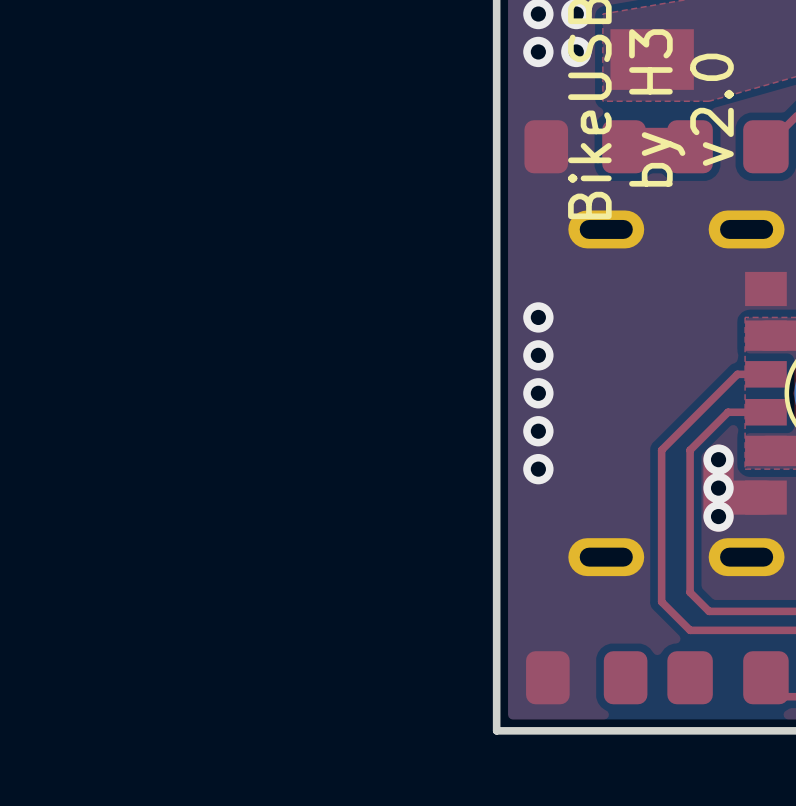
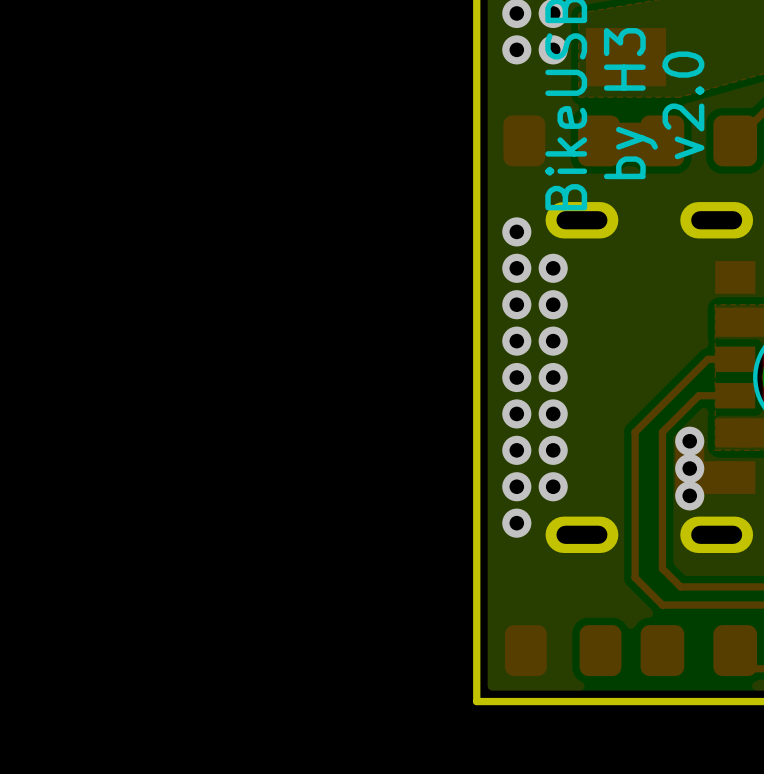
via: none -> (516, 231)
via: none -> (516, 268)
via: none -> (553, 268)
via: none -> (553, 304)
via: none -> (553, 341)
via: none -> (553, 377)
via: none -> (553, 413)
via: none -> (553, 450)
via: none -> (516, 486)
via: none -> (553, 486)
via: none -> (516, 523)

